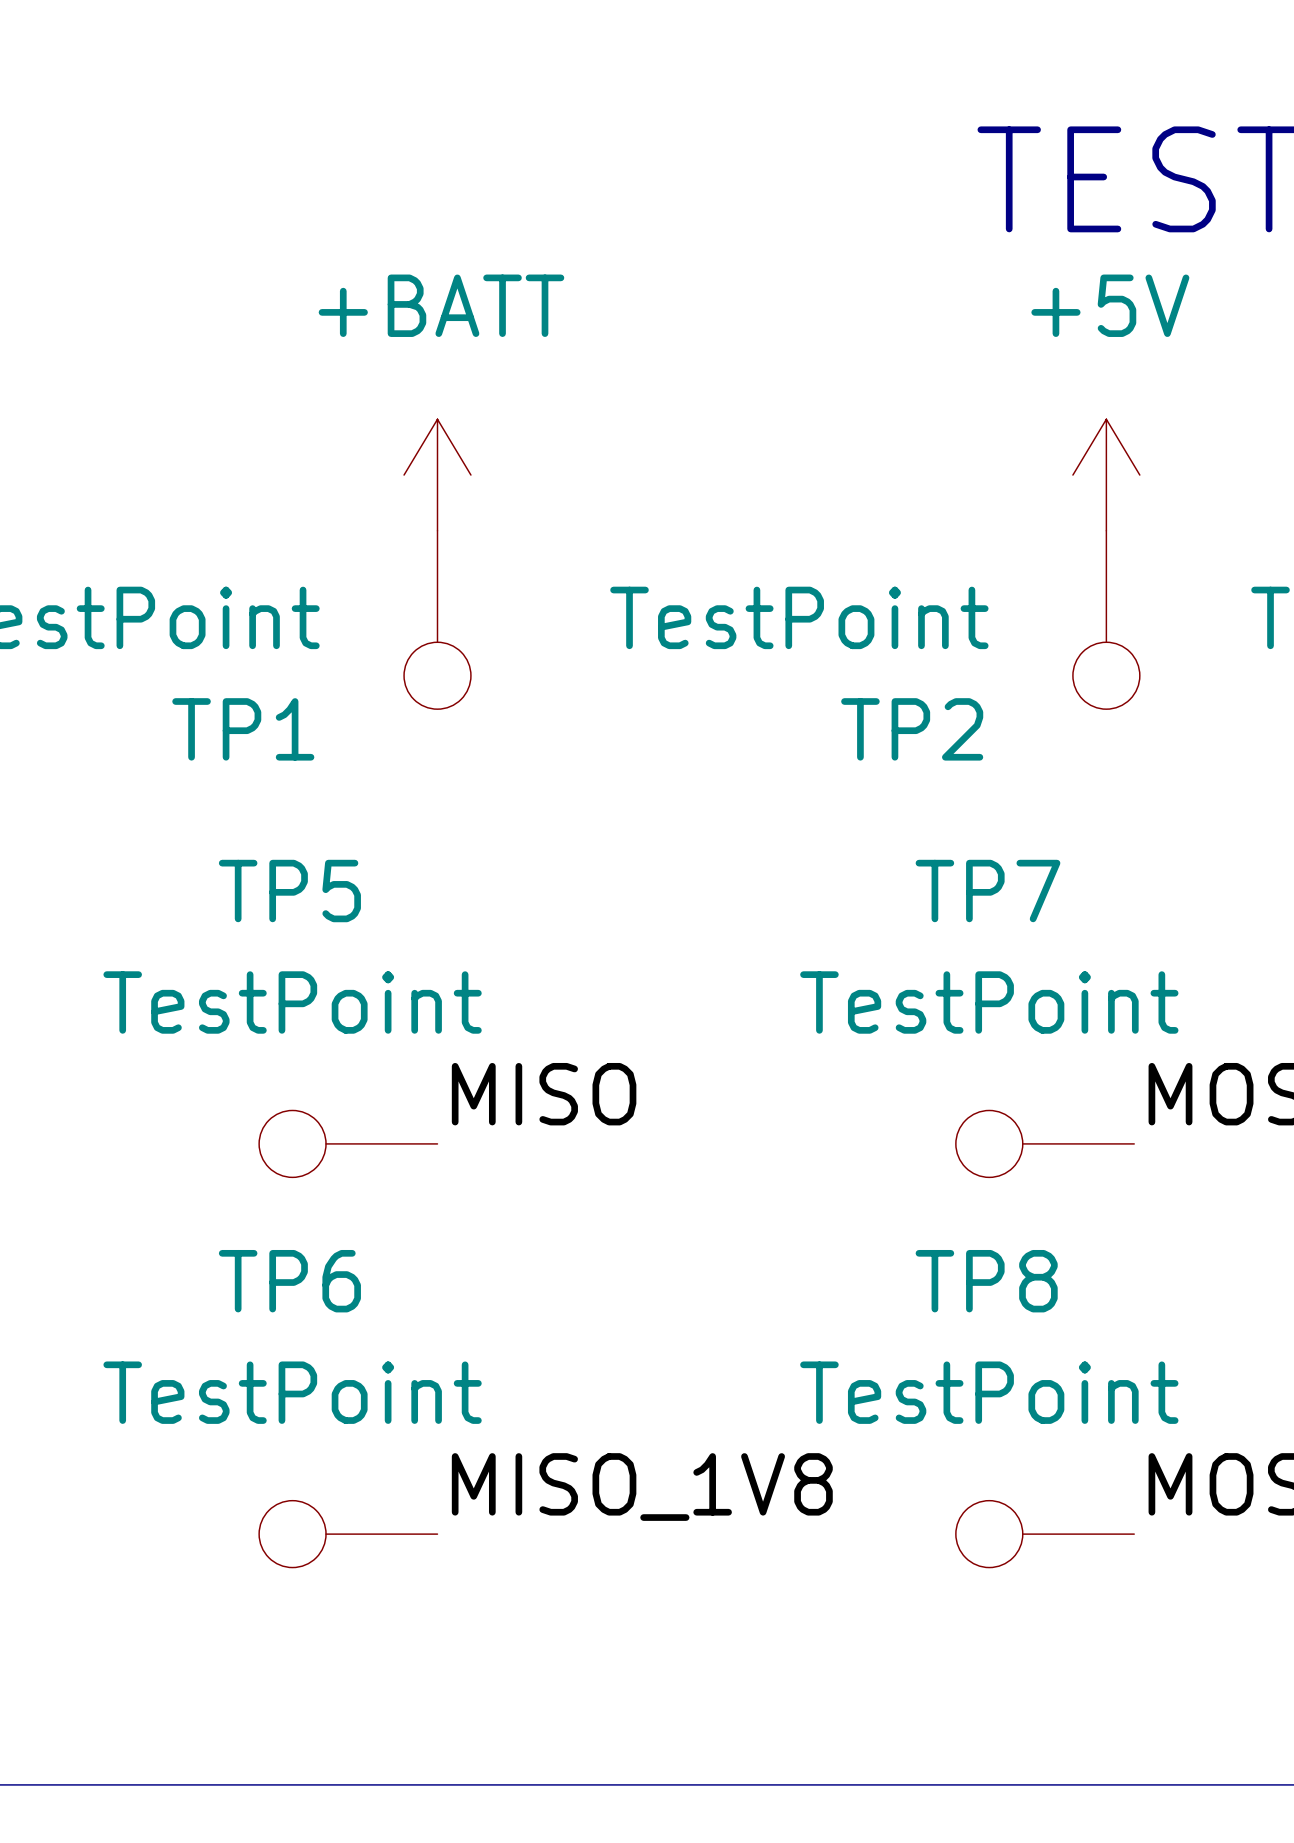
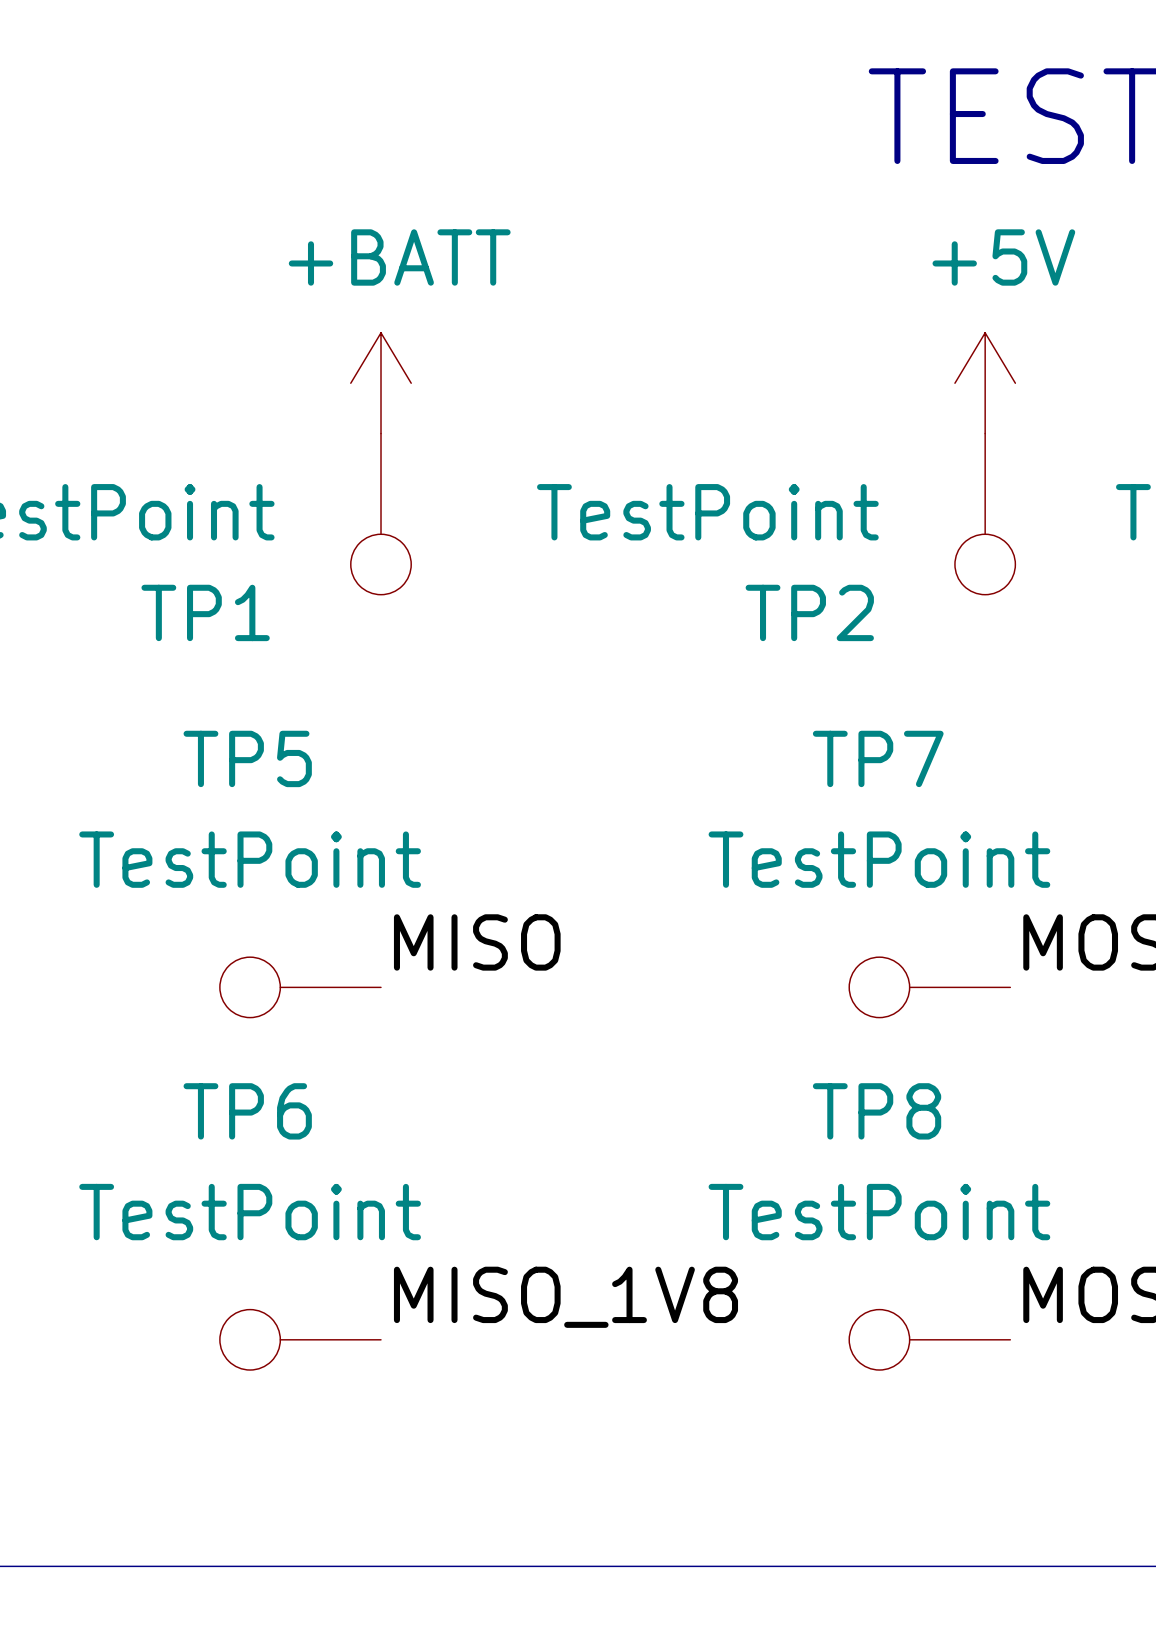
power symbol text position: +BATT (441, 305) -> +BATT (399, 257)
power symbol text position: +5V (1110, 305) -> +5V (1003, 257)

